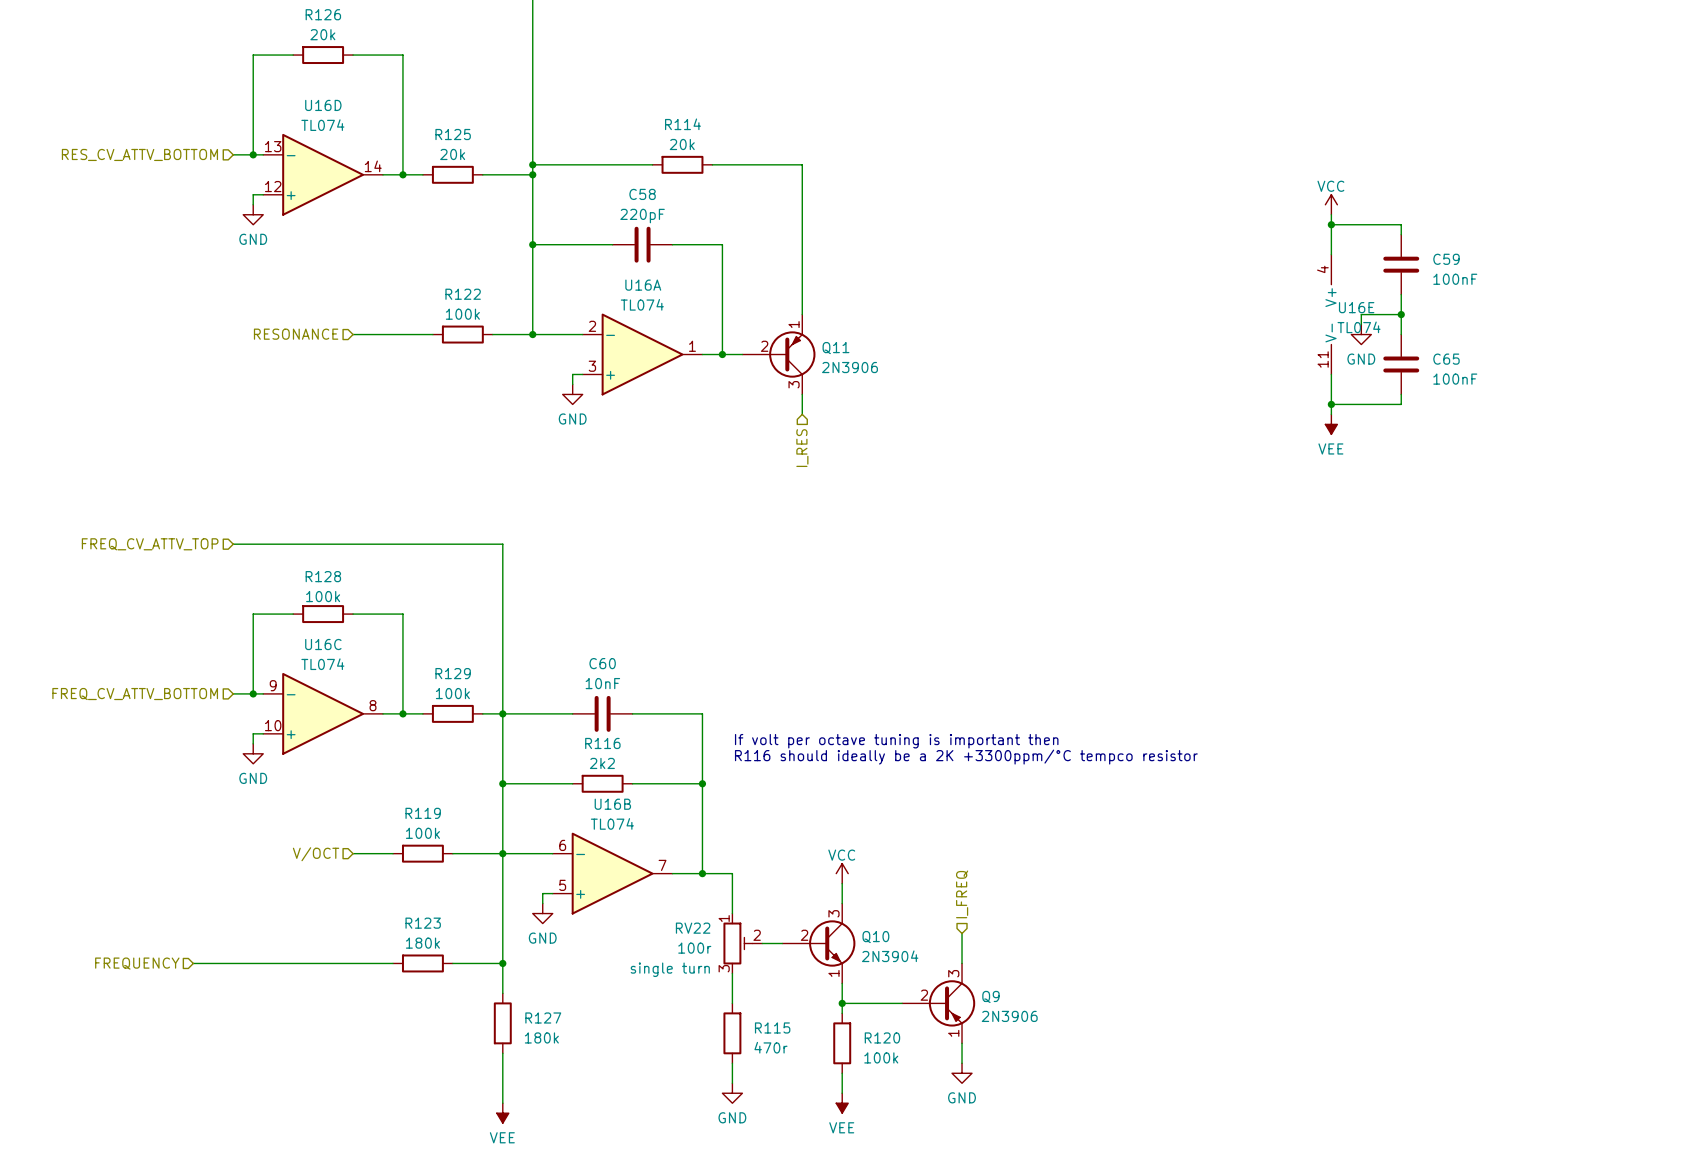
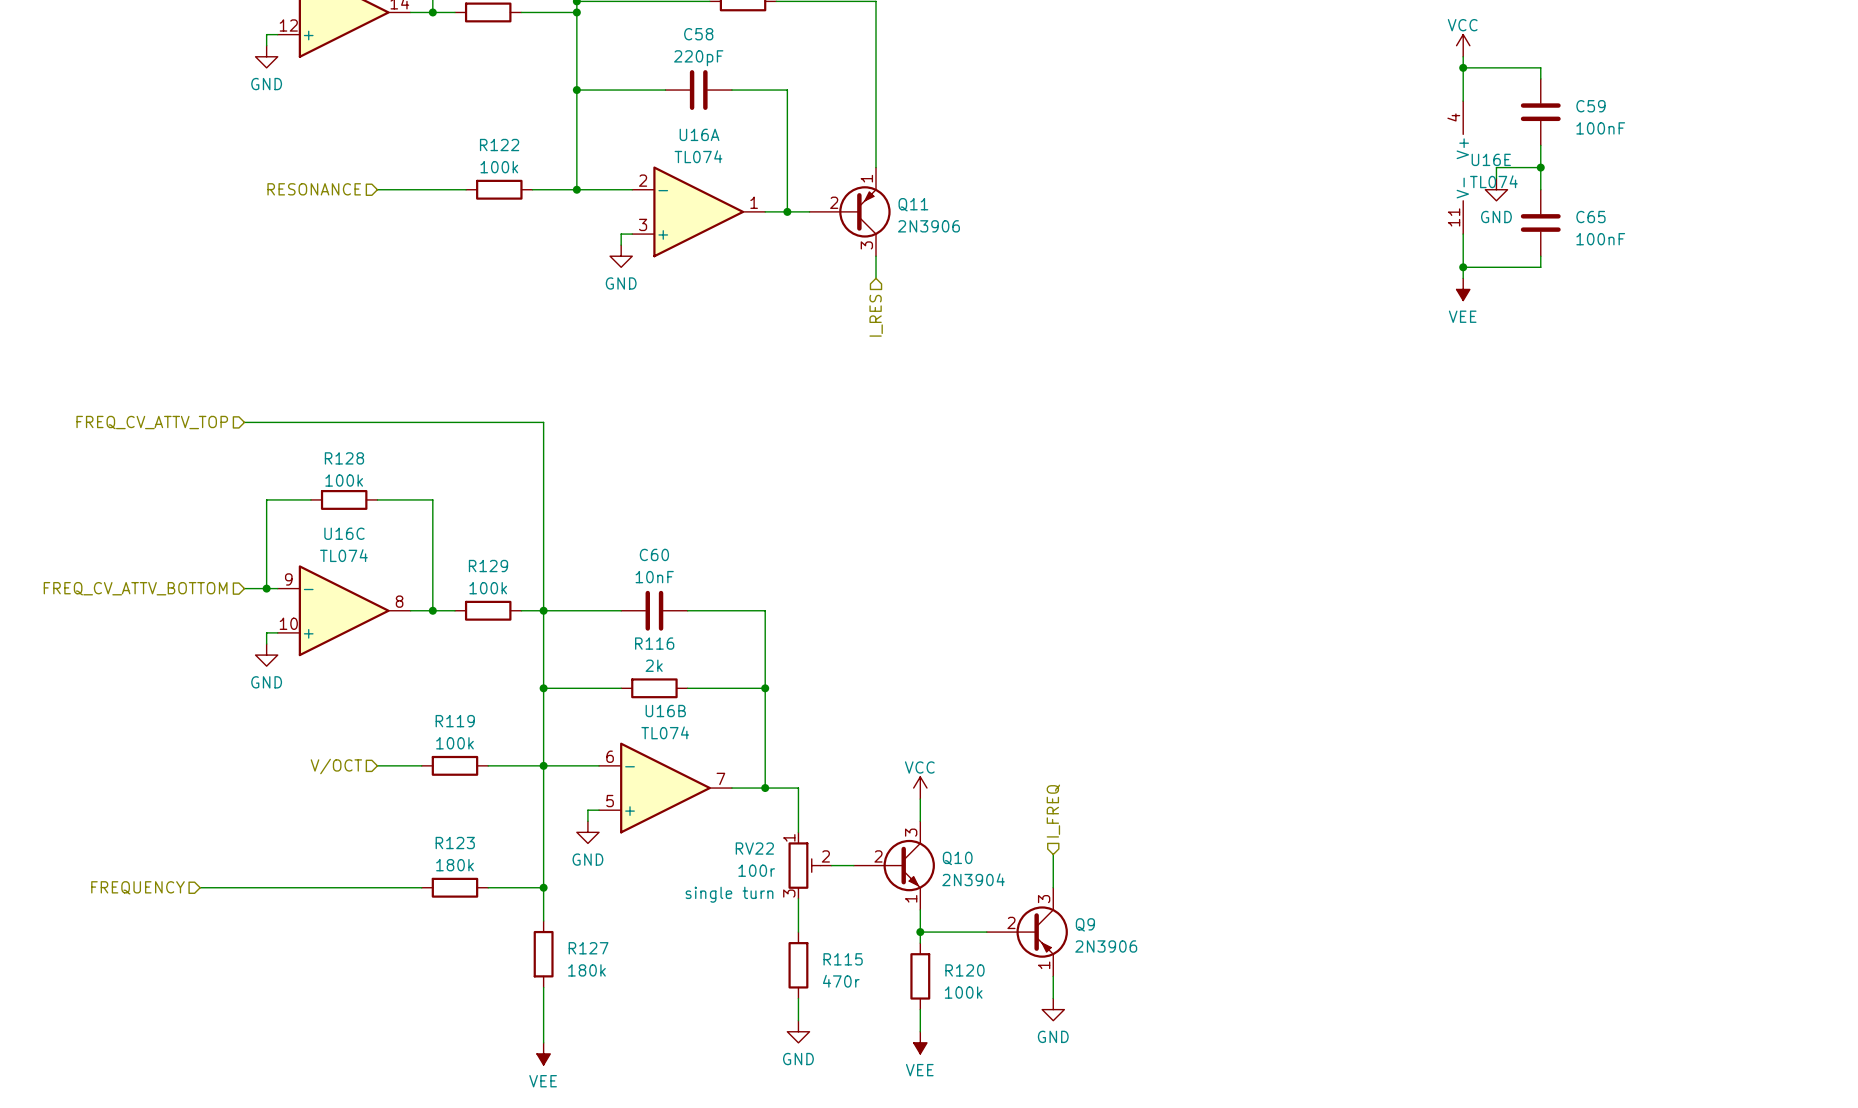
text: If volt per octave tuning is important then (896, 741) -> none
text: R116 should ideally be a 2K +3300ppm/°C tempco resistor (966, 757) -> none
R116 value: 2k2 (602, 763) -> 2k (654, 665)

